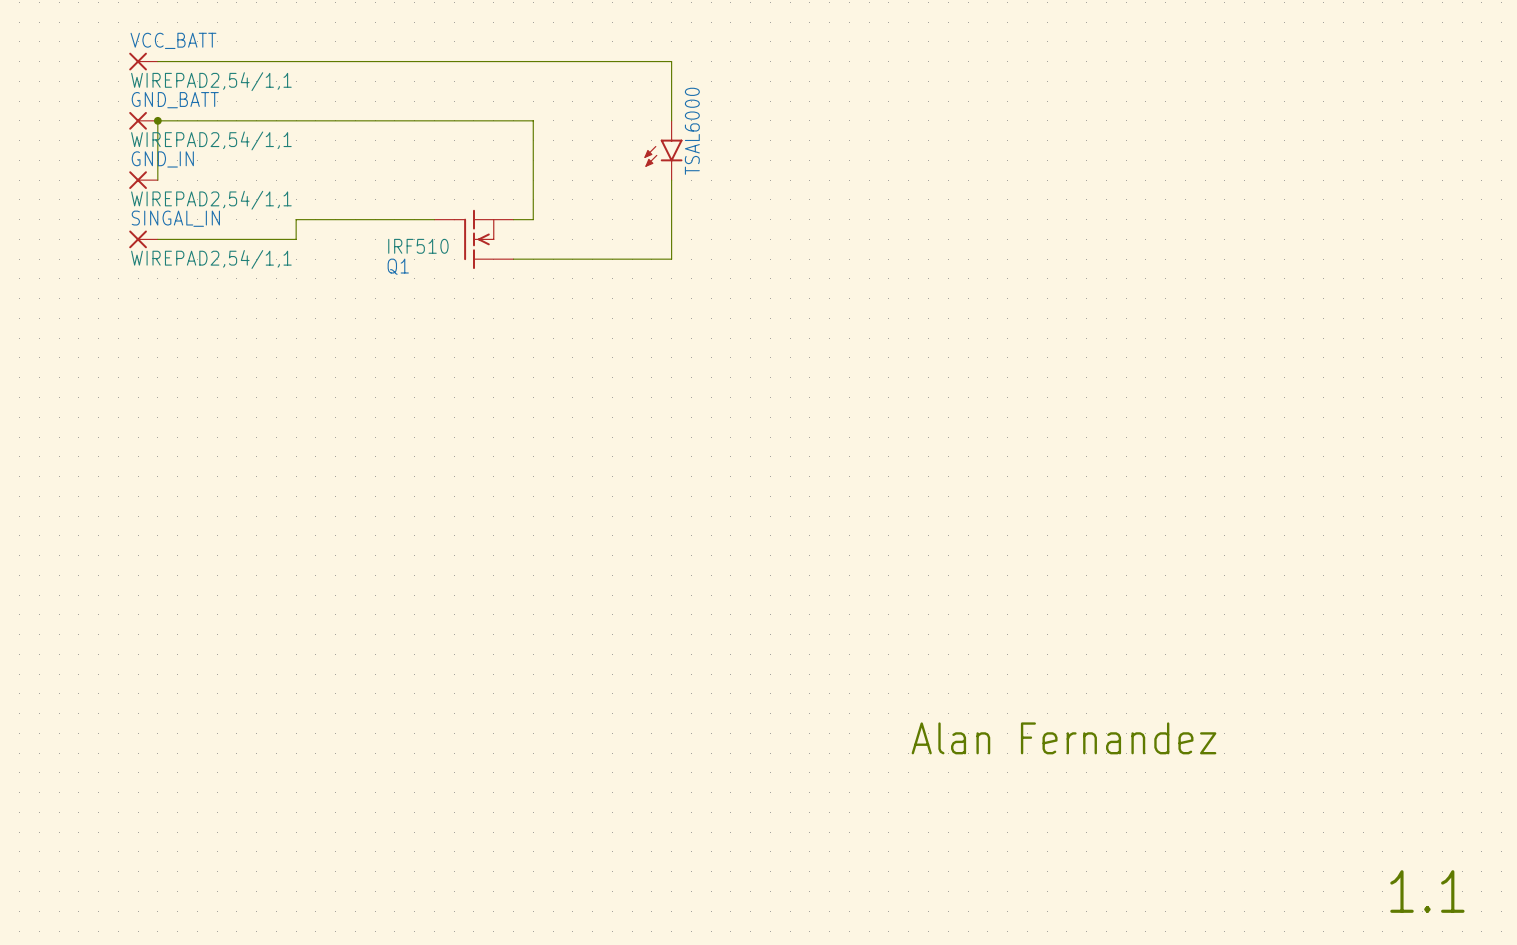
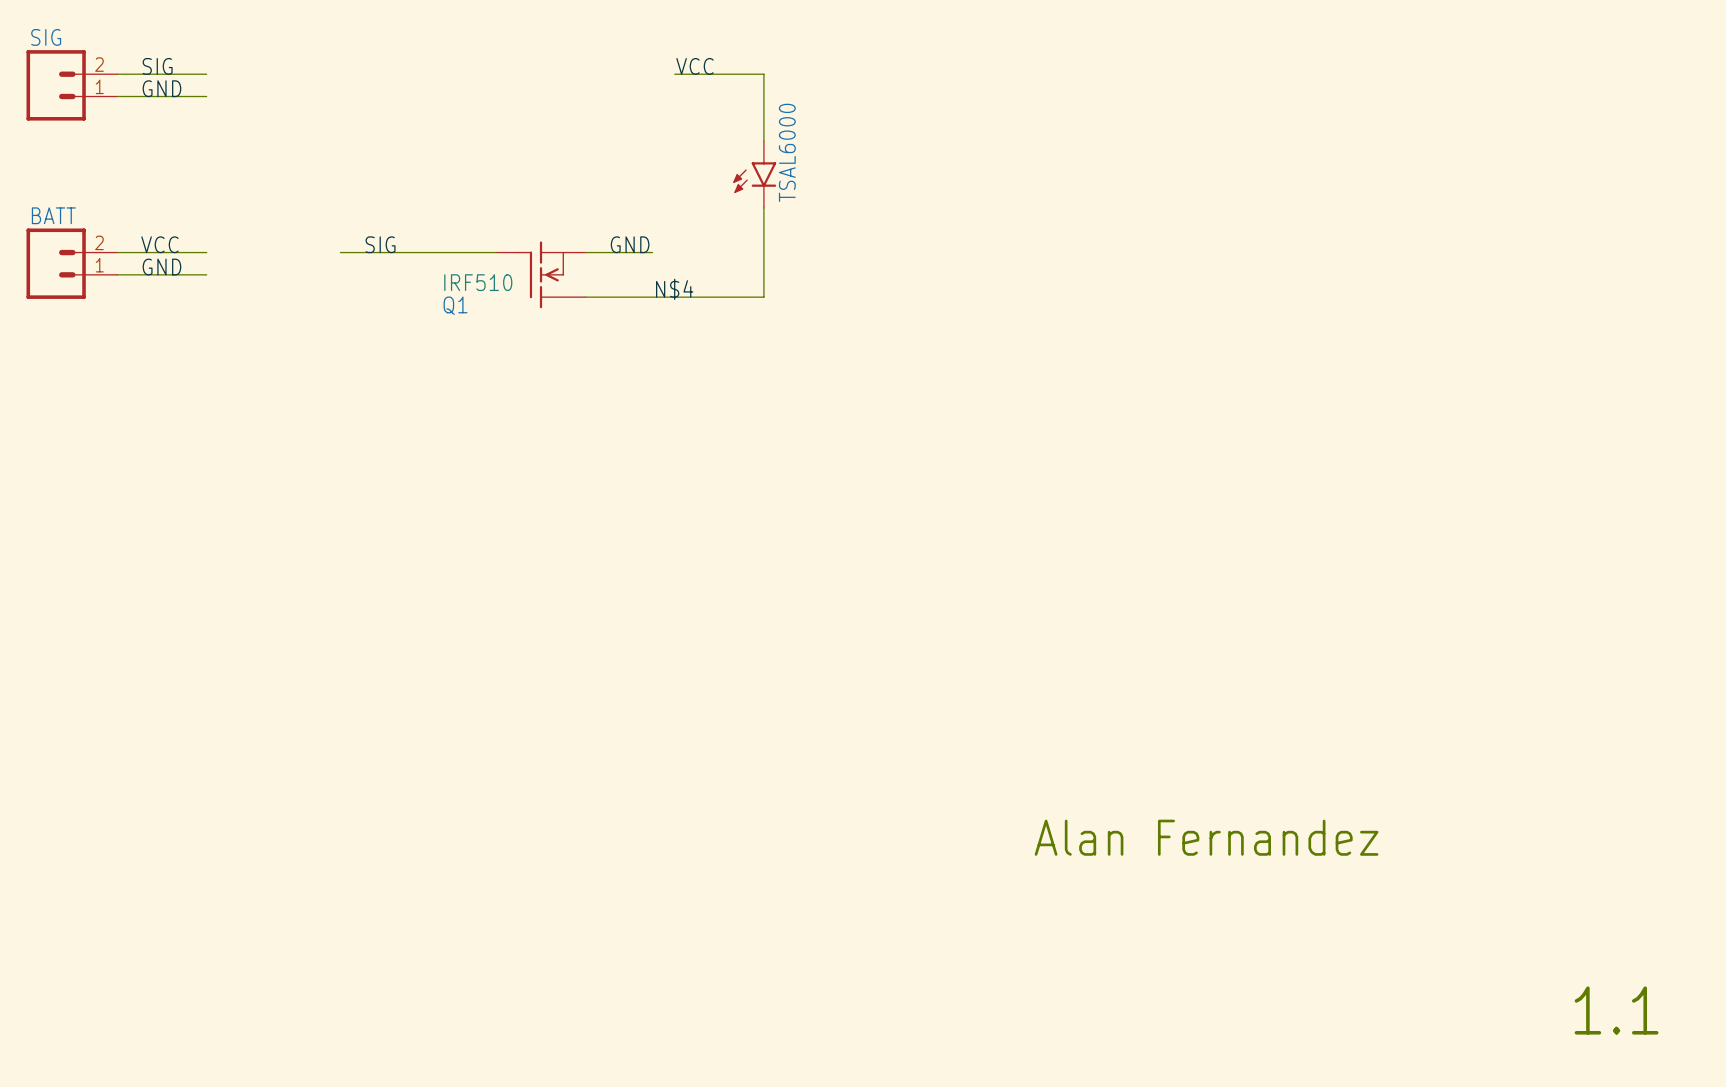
label: none -> SIG (157, 66)
label: none -> VCC (694, 66)
wire: none -> (117, 74) (184, 74)
VCC_BATT: WIREPAD2,54/1,1 (143, 61) -> none
wire: (177, 61) (592, 61) -> none
SIG: none -> (71, 85)
label: none -> GND (161, 88)
wire: none -> (117, 96) (206, 96)
GND_BATT: WIREPAD2,54/1,1 (143, 120) -> none
junction: (157, 120) -> none
GND_IN: WIREPAD2,54/1,1 (143, 180) -> none
wire: (157, 180) (157, 120) (533, 120) (533, 219) -> (652, 252) (607, 252)
label: none -> VCC (159, 244)
label: none -> SIG (380, 244)
label: none -> GND (630, 244)
wire: none -> (117, 252) (206, 252)
wire: (296, 219) (296, 239) (177, 239) -> none
BATT: none -> (71, 263)
label: none -> GND (161, 267)
wire: none -> (117, 274) (184, 274)
SINGAL_IN: WIREPAD2,54/1,1 (143, 239) -> none
label: none -> N$4 (674, 289)

